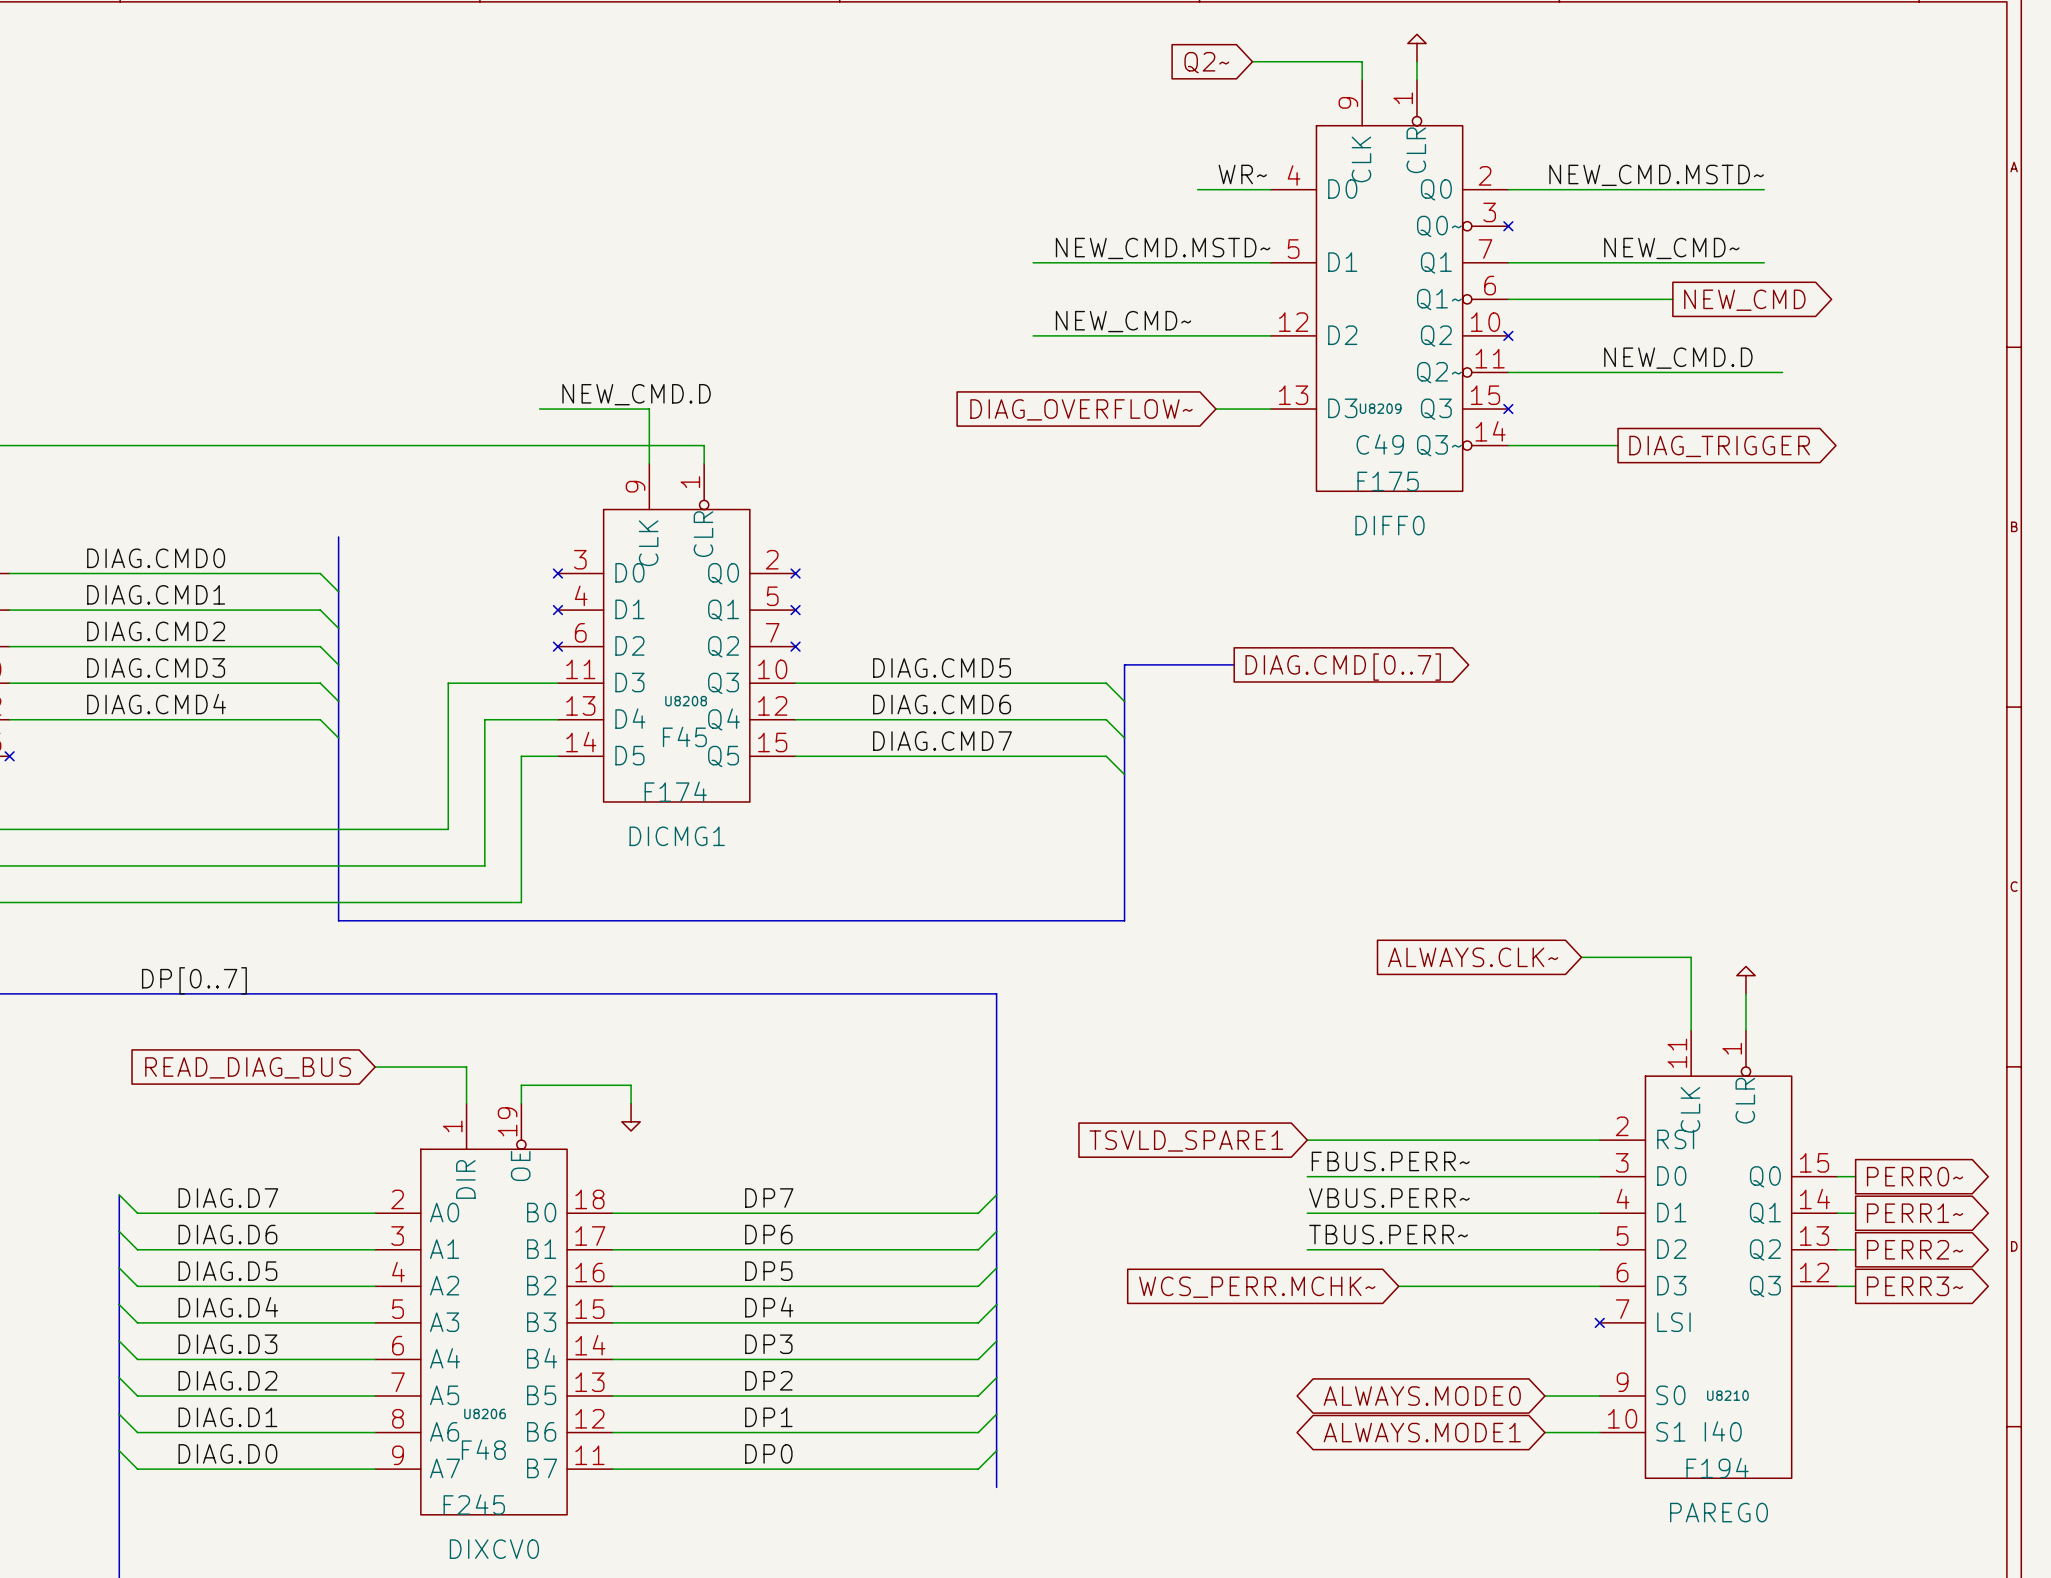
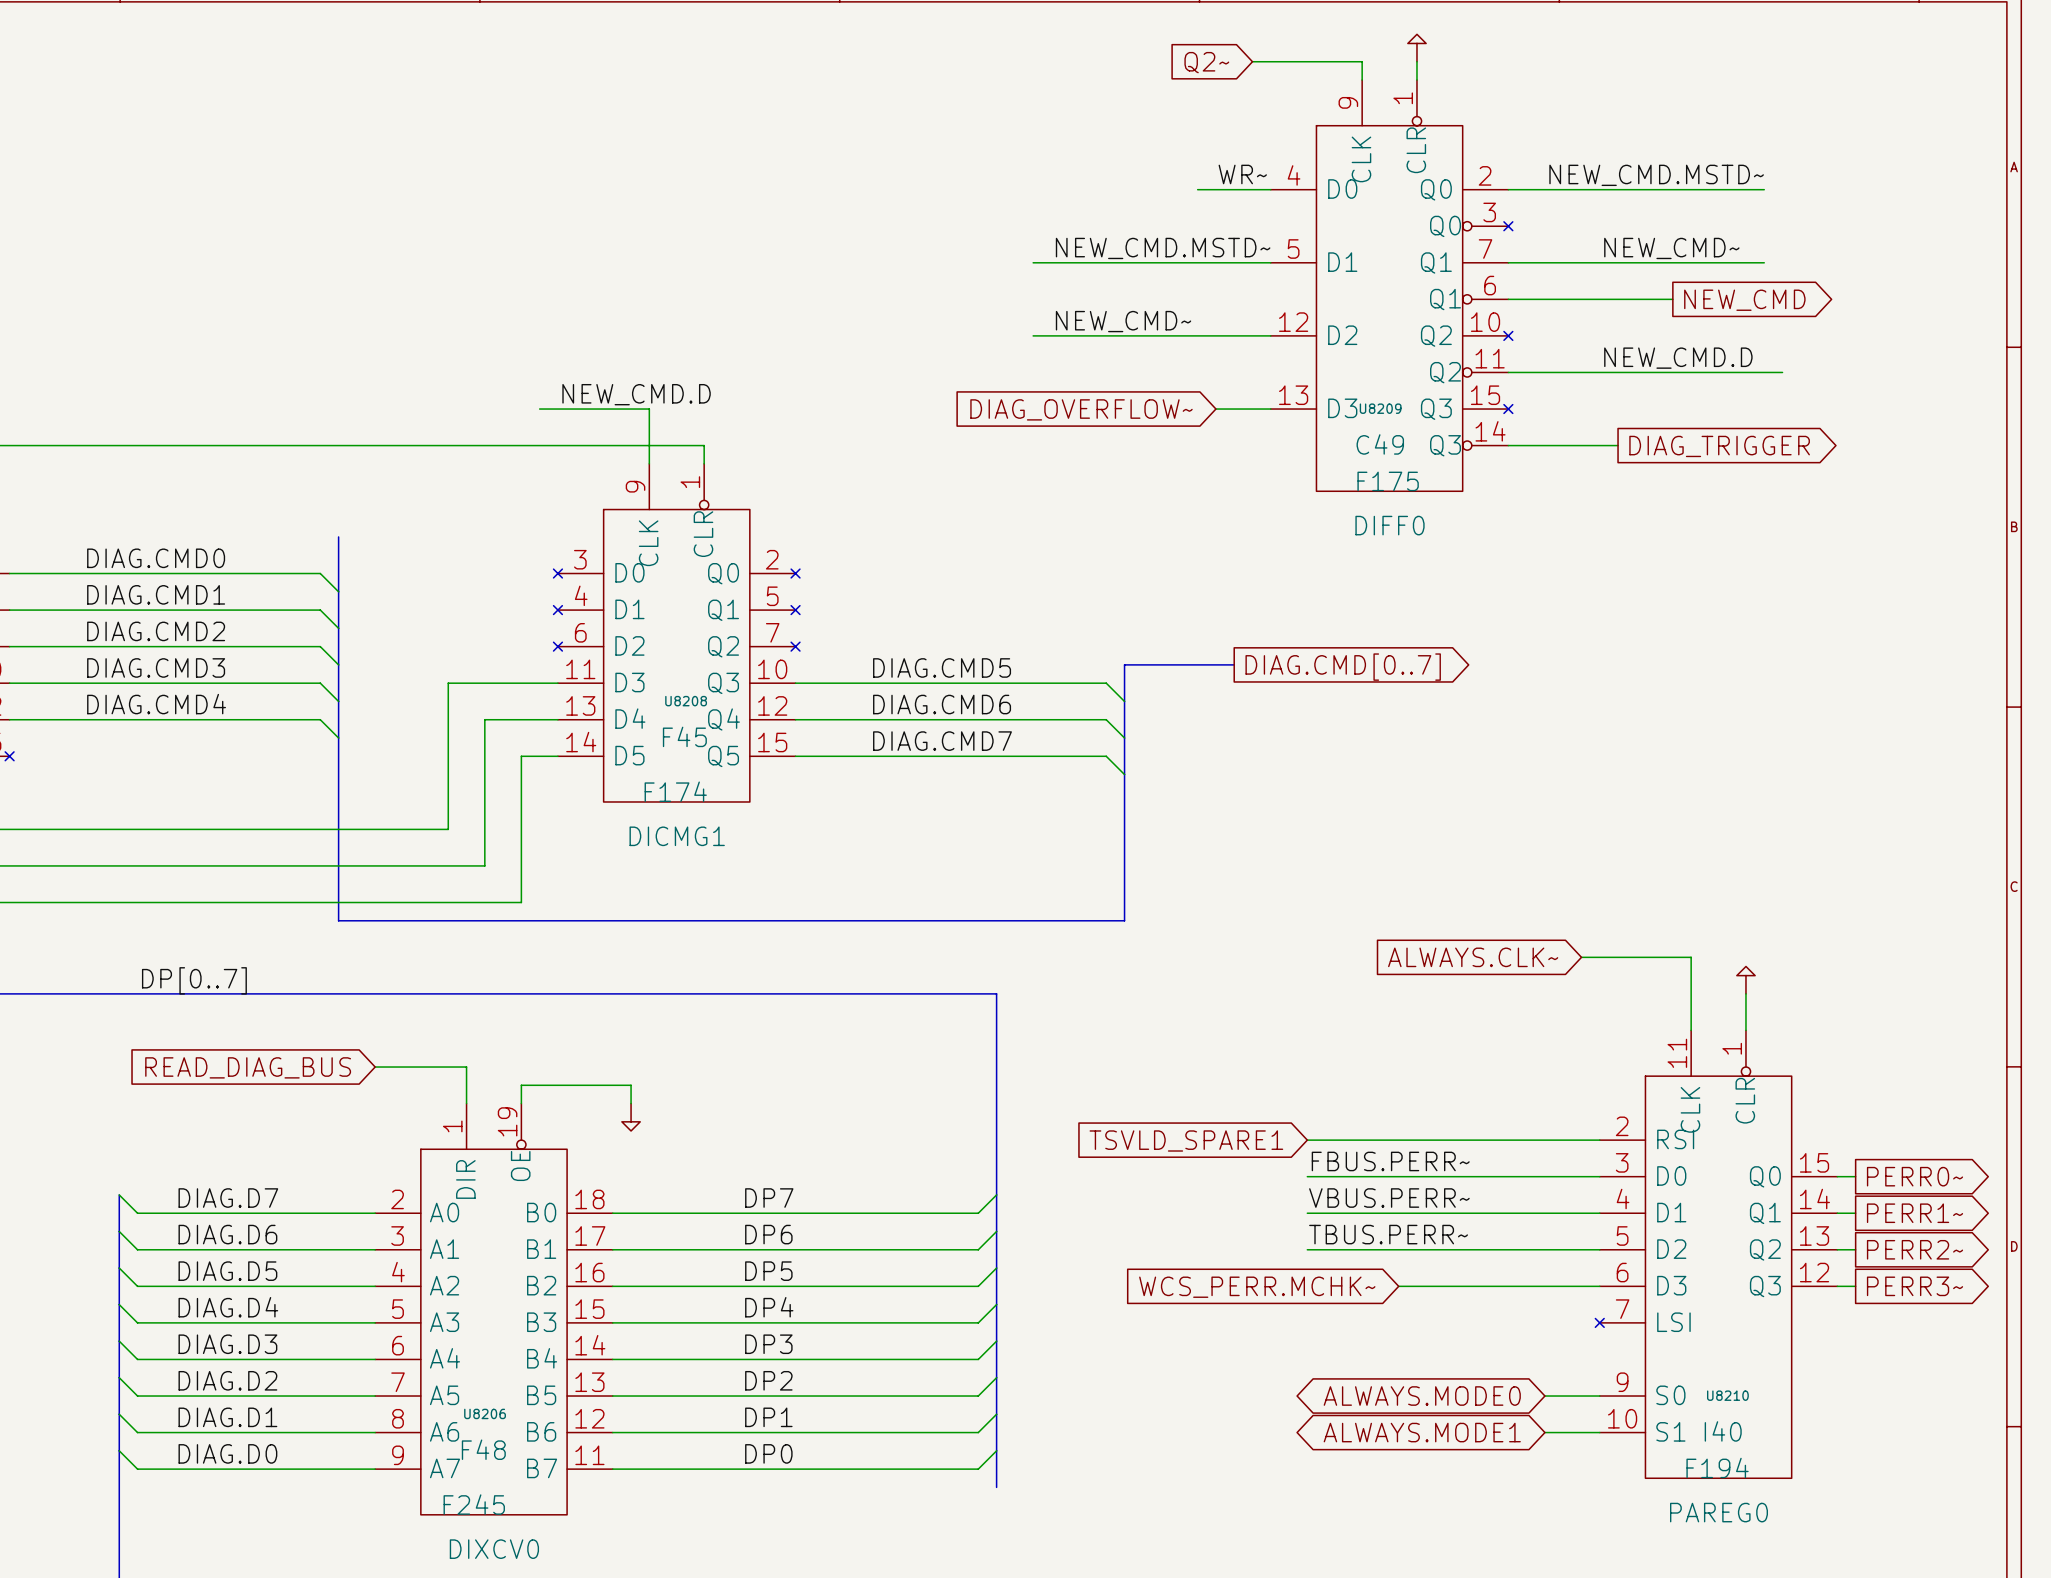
U8209 pin name: Q0~ (1439, 226) -> Q0 (1445, 226)
U8209 pin name: Q1~ (1439, 299) -> Q1 (1445, 299)
U8209 pin name: Q2~ (1439, 372) -> Q2 (1445, 372)
U8209 pin name: Q3~ (1439, 445) -> Q3 (1445, 445)

